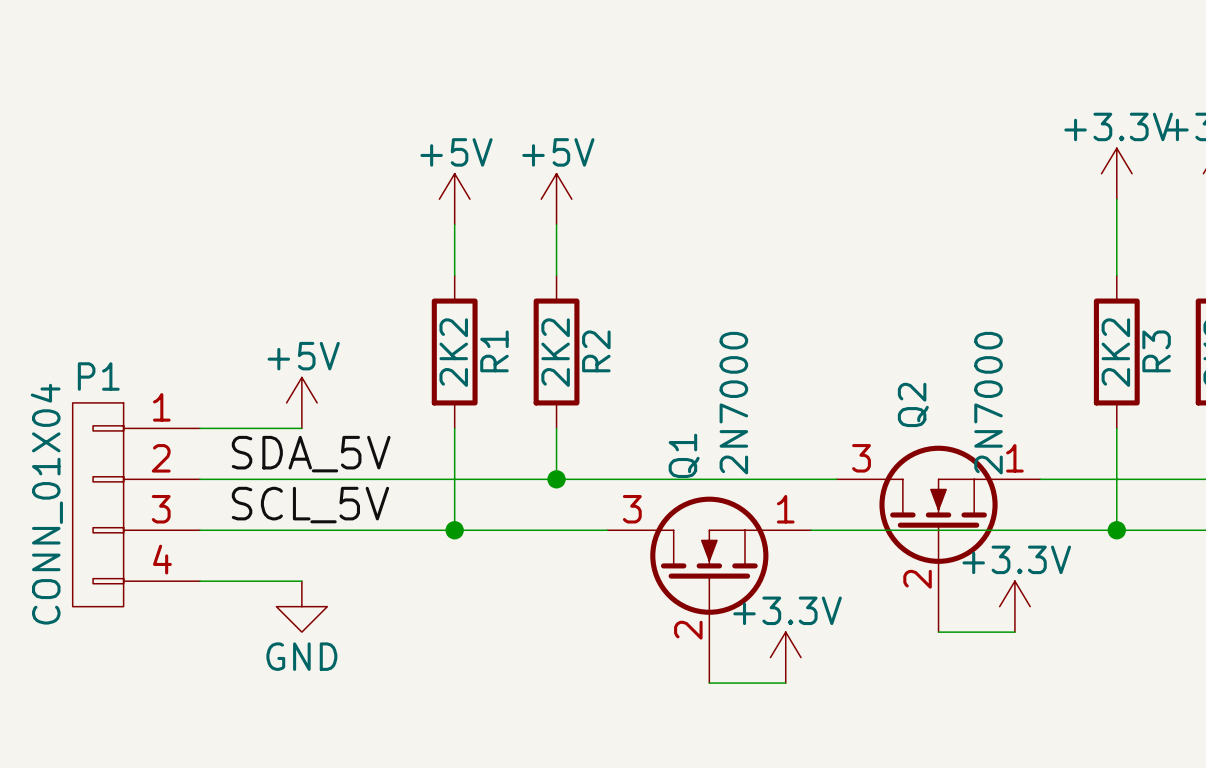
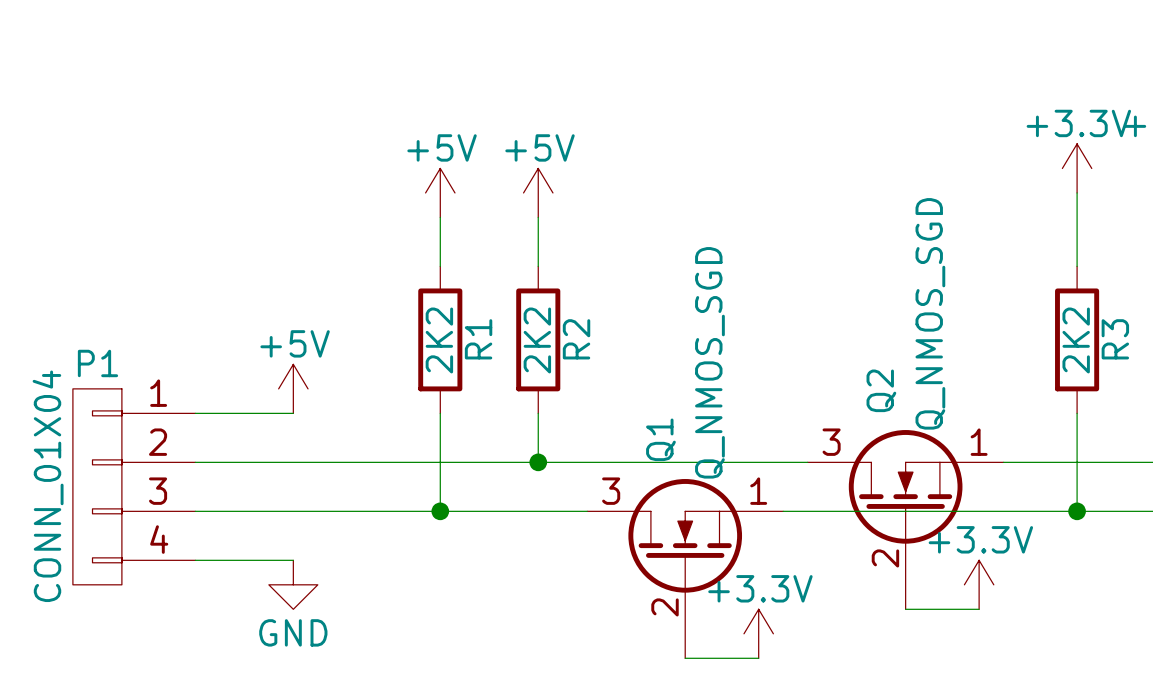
Q1 value: 2N7000 (733, 403) -> Q_NMOS_SGD (709, 362)
Q2 value: 2N7000 (988, 403) -> Q_NMOS_SGD (930, 313)
label: SDA_5V (311, 454) -> none
label: SCL_5V (310, 505) -> none

